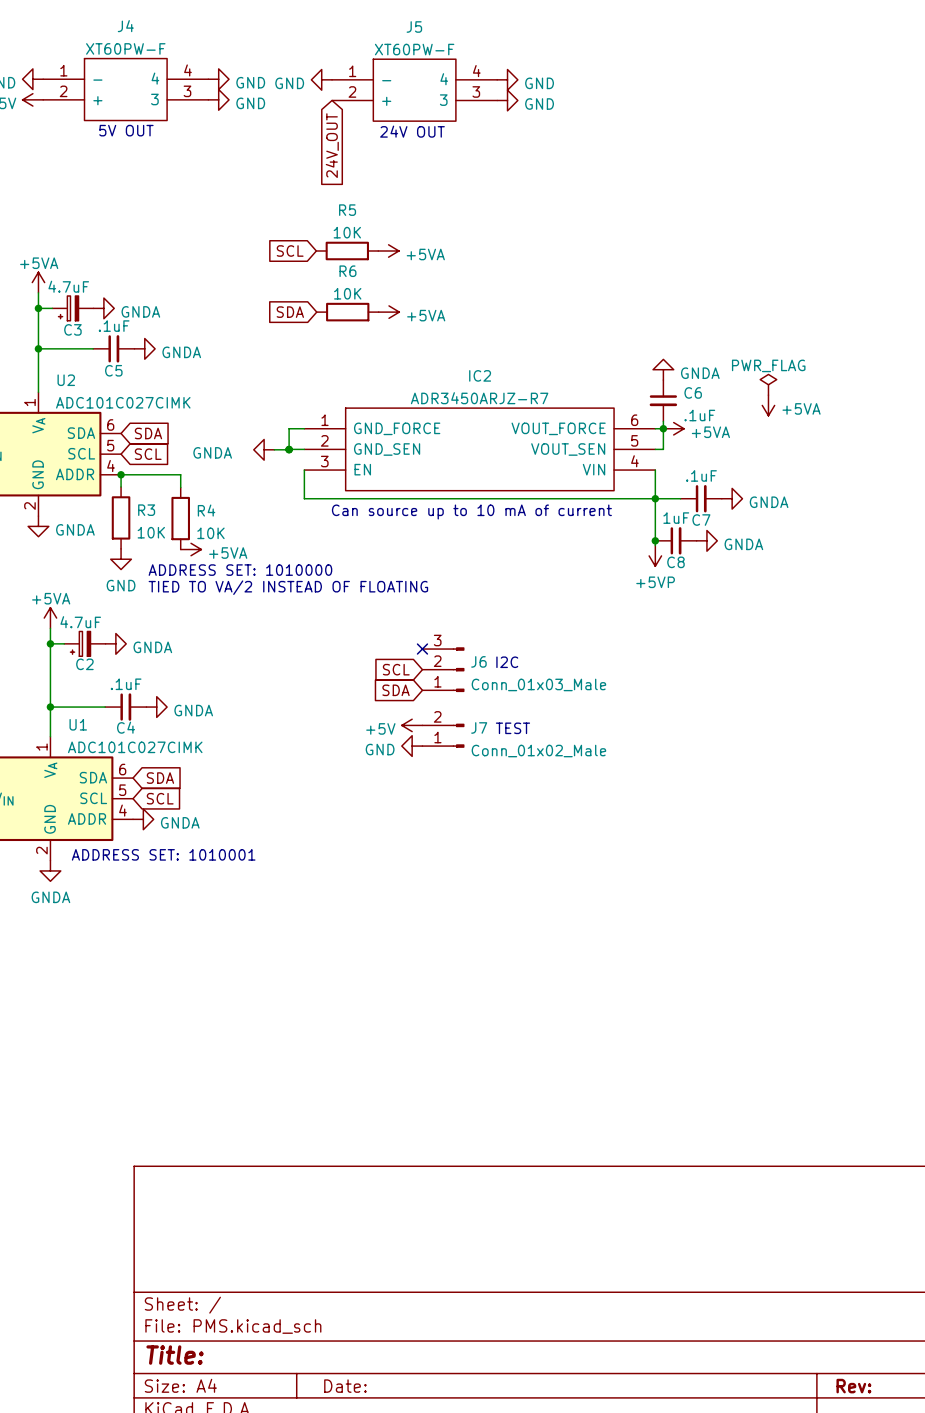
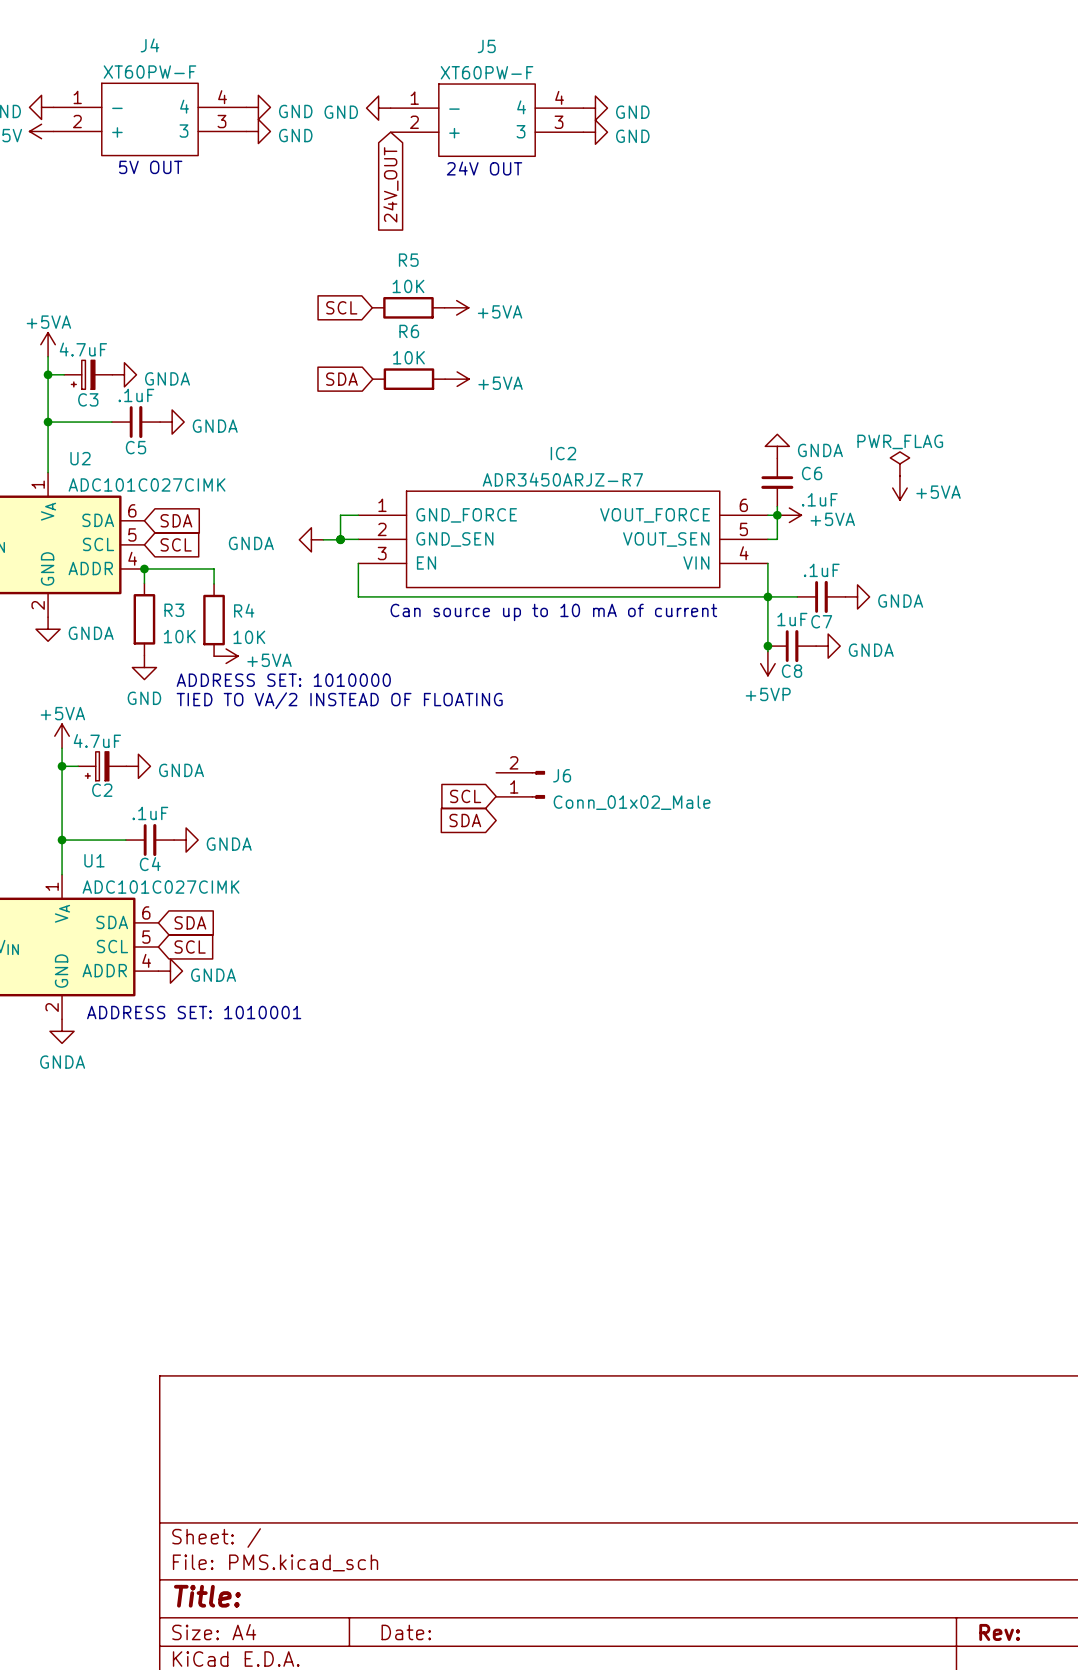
J6 symbol: [422, 647, 465, 692] -> [496, 770, 546, 799]
no-connect mark: (422, 649) -> none
text: I2C (507, 662) -> none
J6 value: Conn_01x03_Male (538, 684) -> Conn_01x02_Male (632, 802)
power symbol: +5V (412, 725) -> none
text: TEST (512, 728) -> none
J7: Conn_01x02_Male (443, 735) -> none
power symbol: GND (412, 746) -> none

